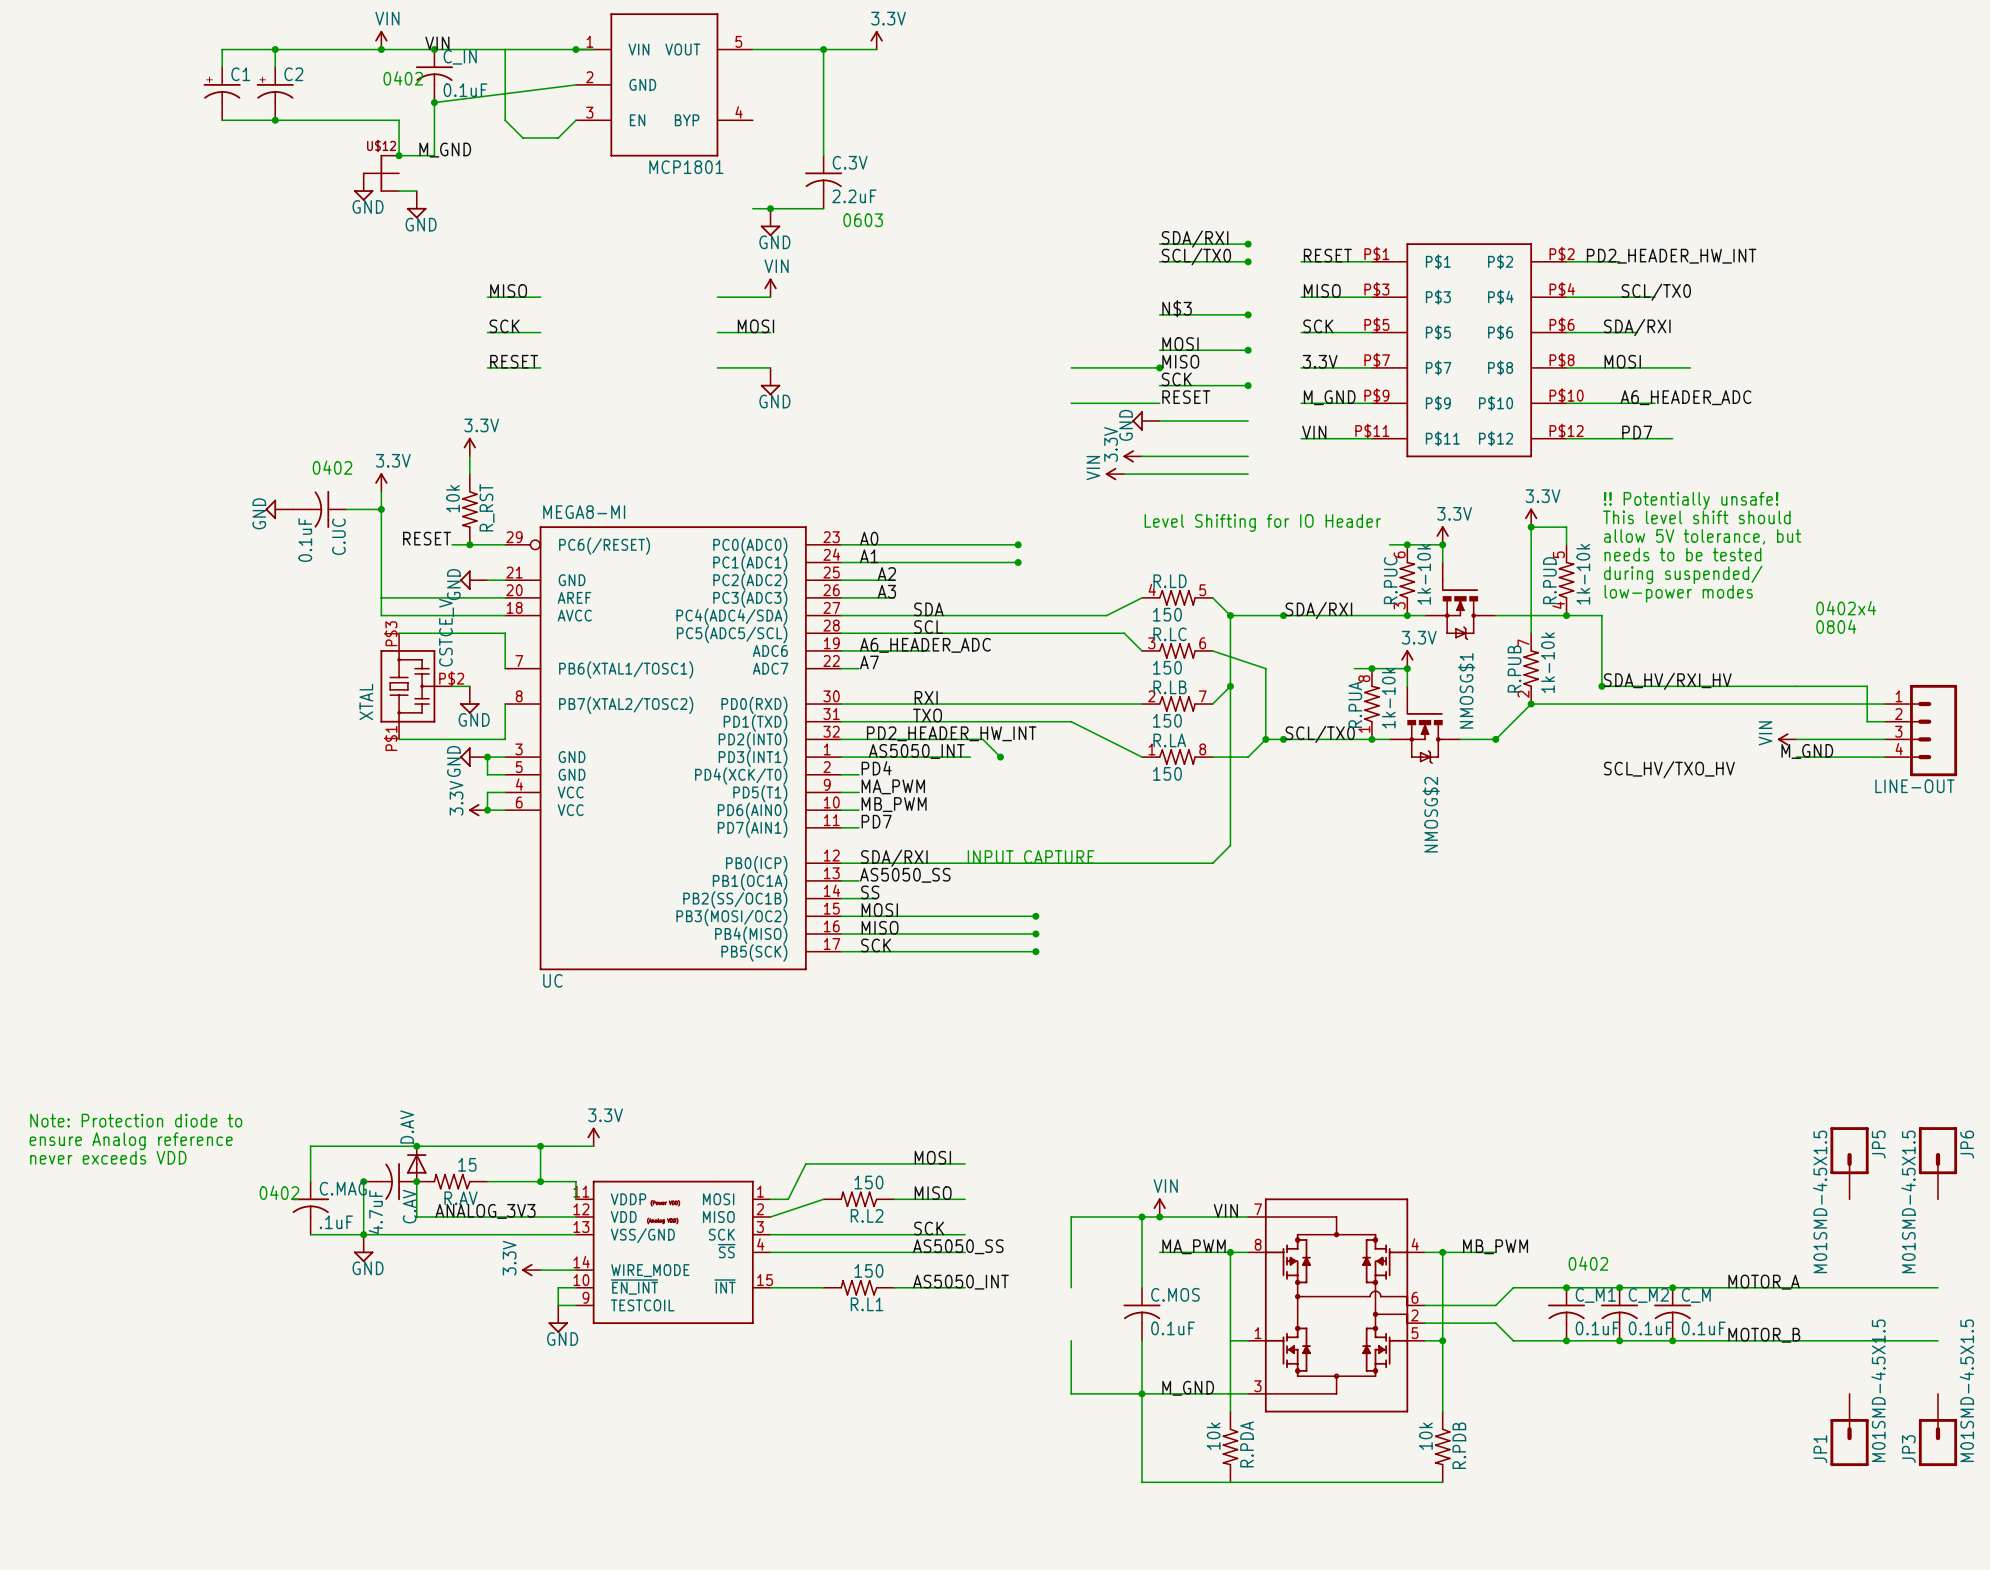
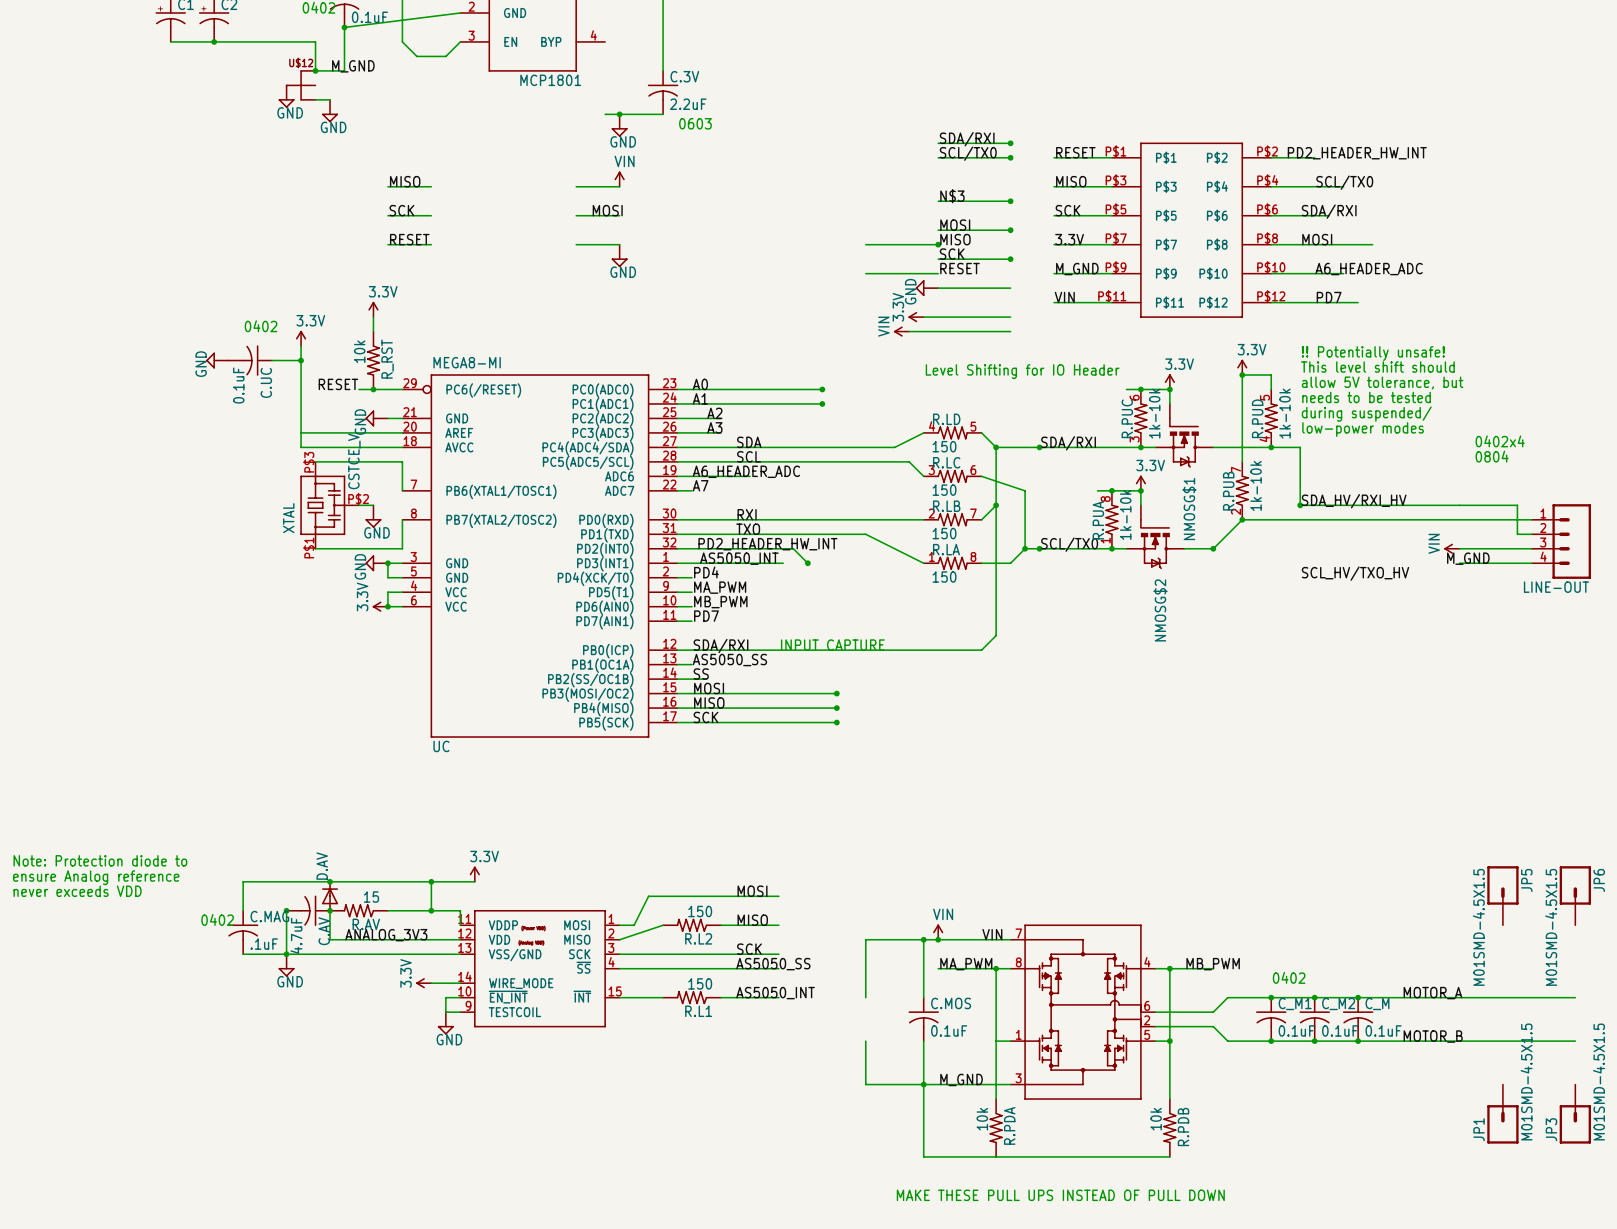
text: none -> MAKE THESE PULL UPS INSTEAD OF PULL DOWN (1060, 1195)

